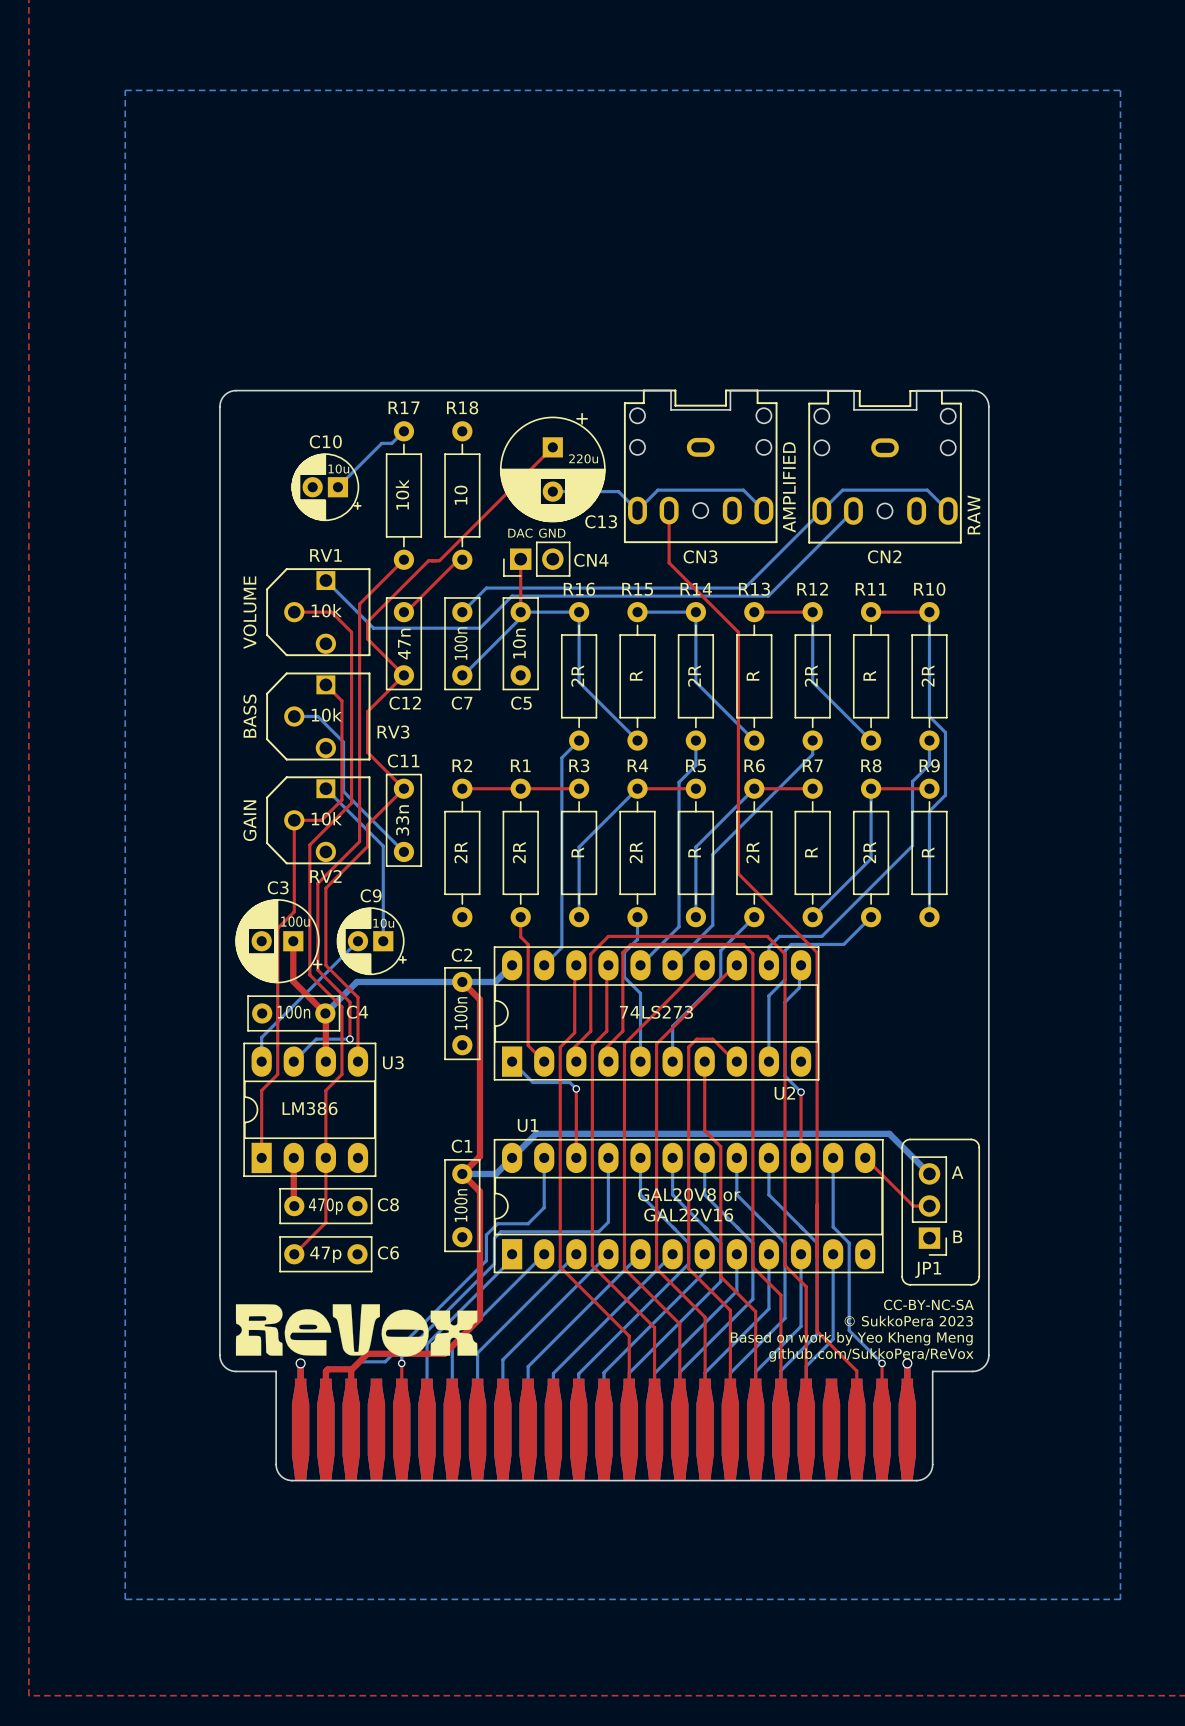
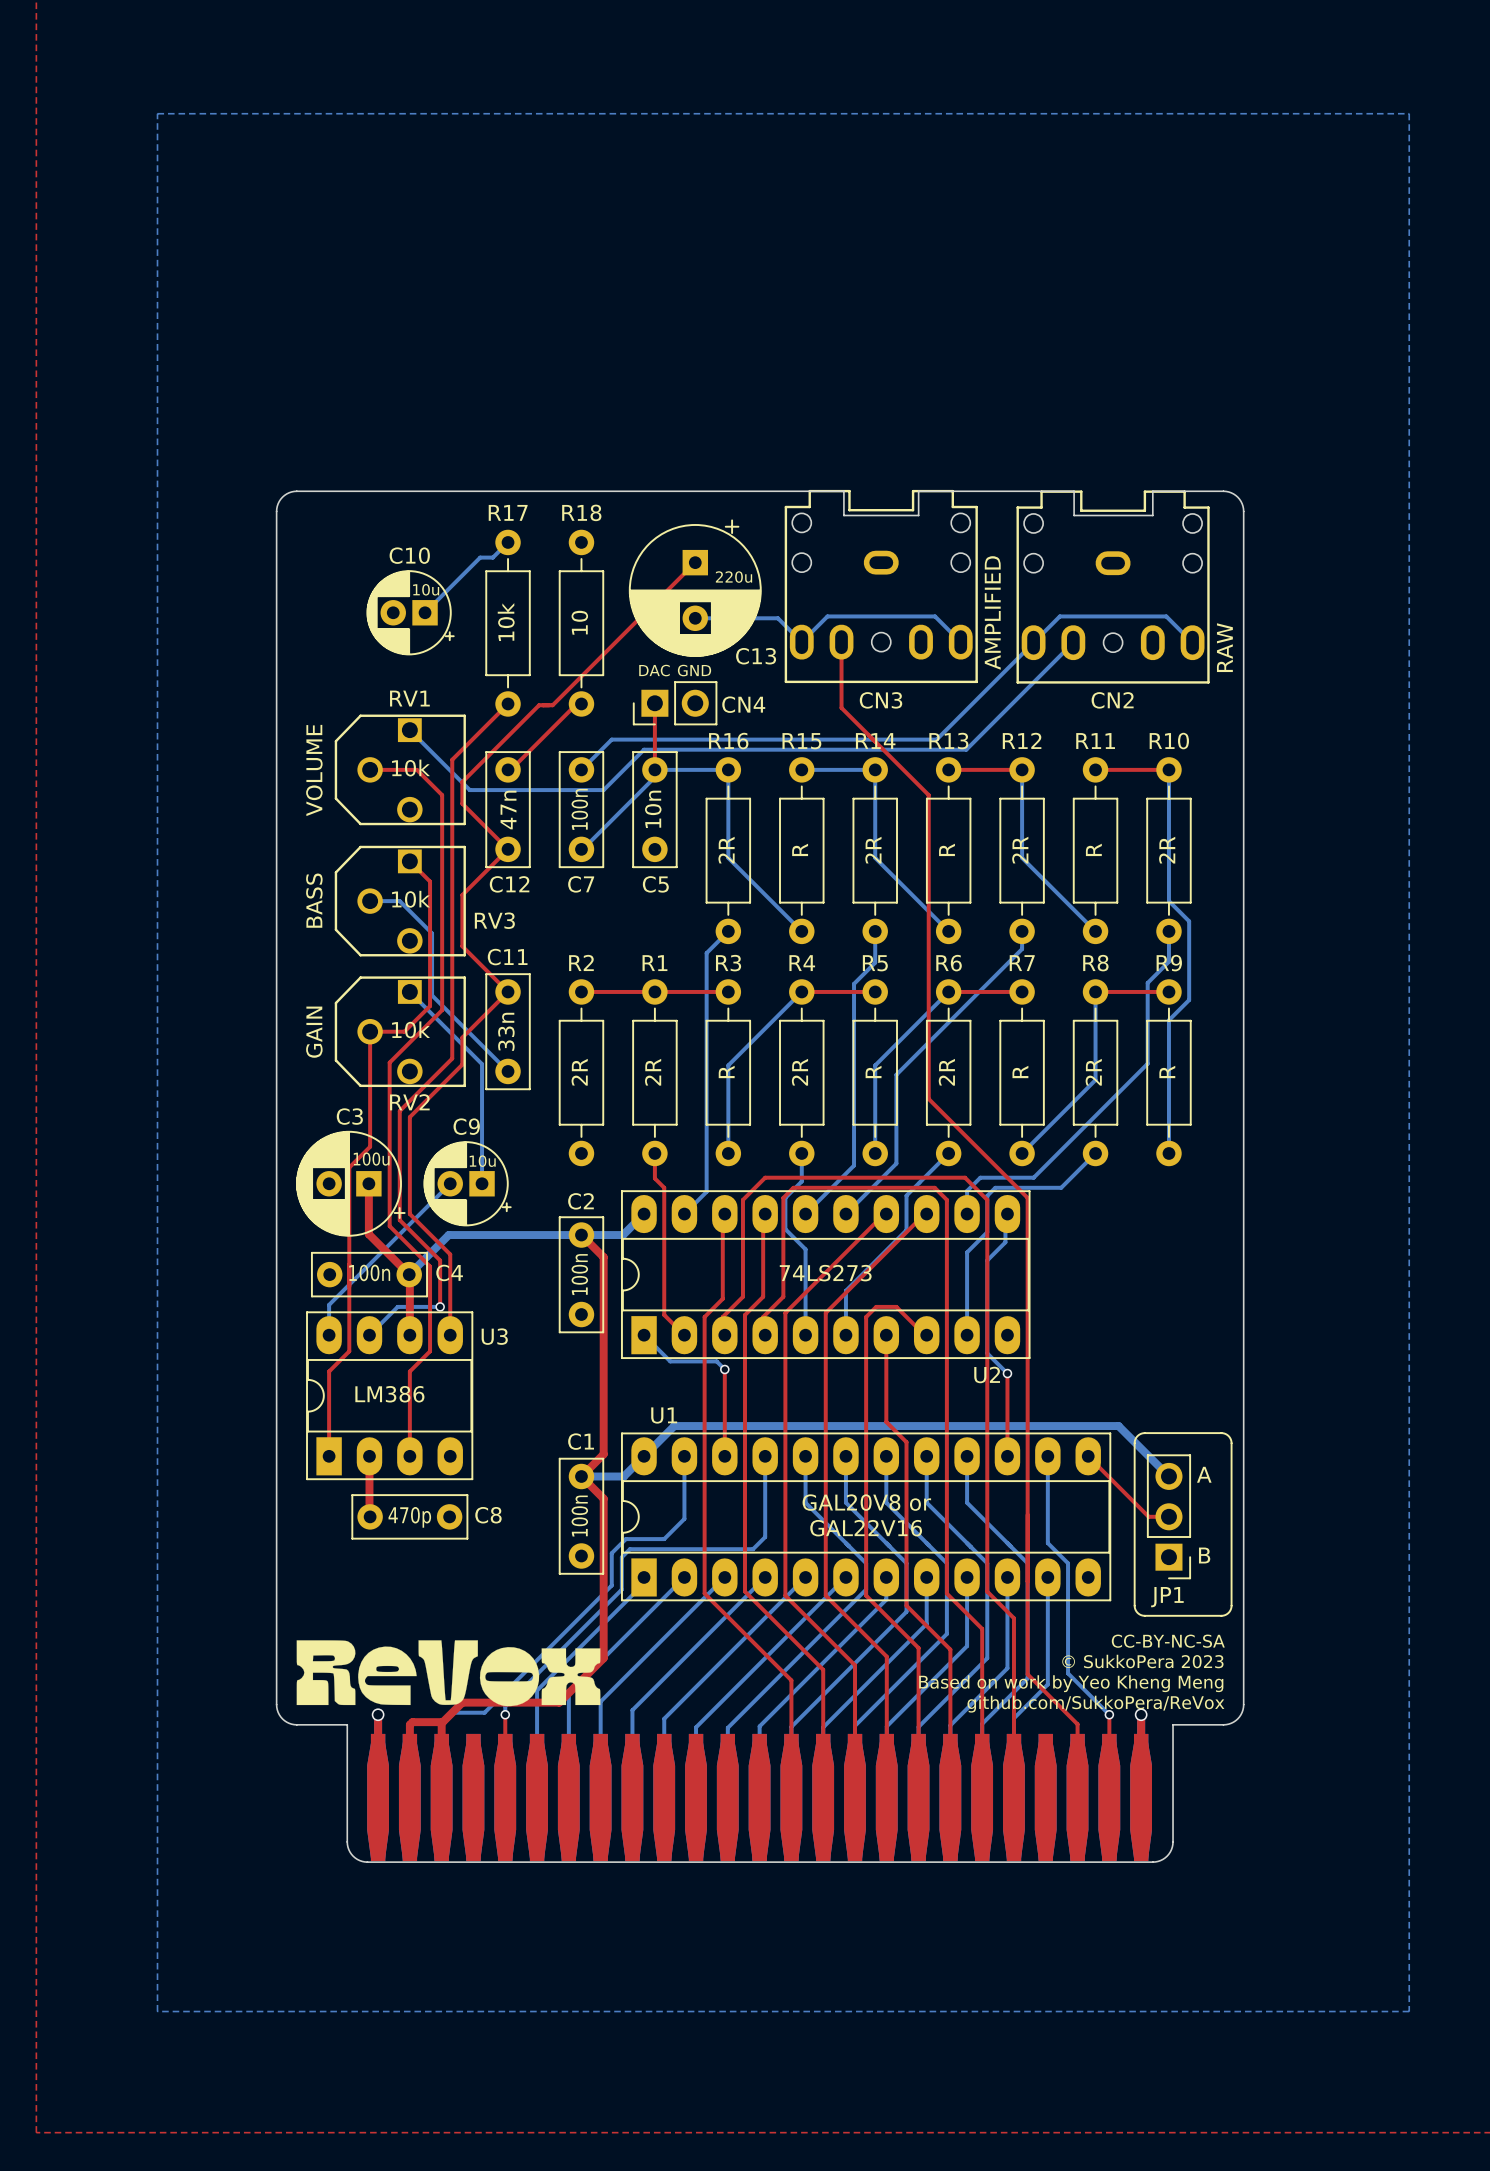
top track: (325, 1157) (325, 1222) (294, 1254) -> none
C6: 47p (325, 1254) -> none

